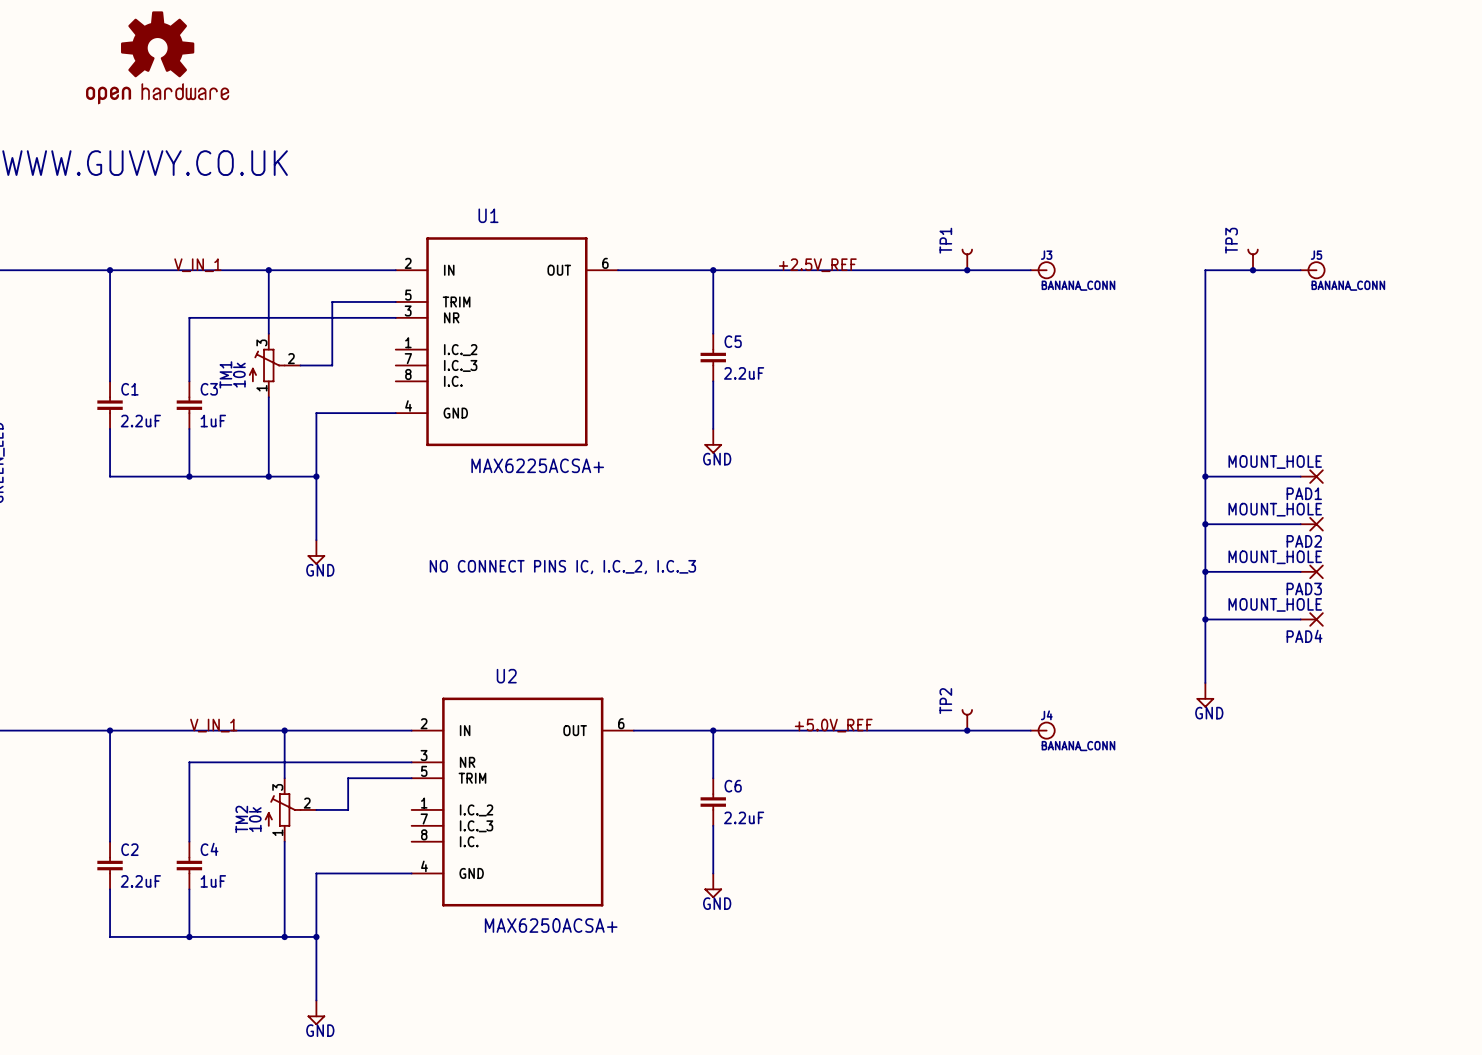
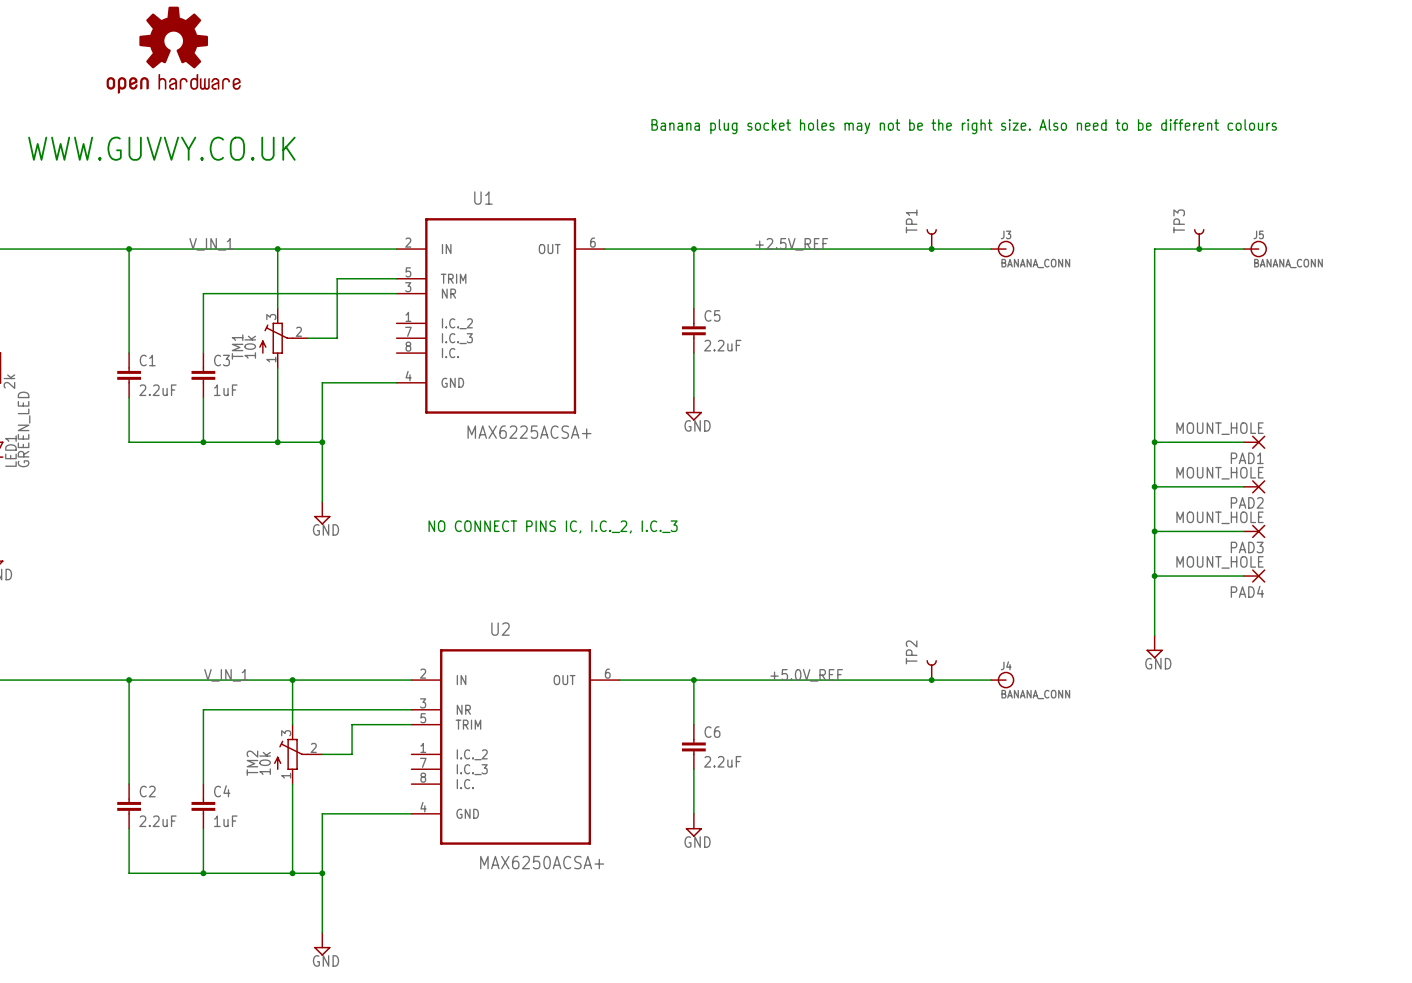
text: none -> Banana plug socket holes may not be the right size. Also need to be different colours (964, 126)

